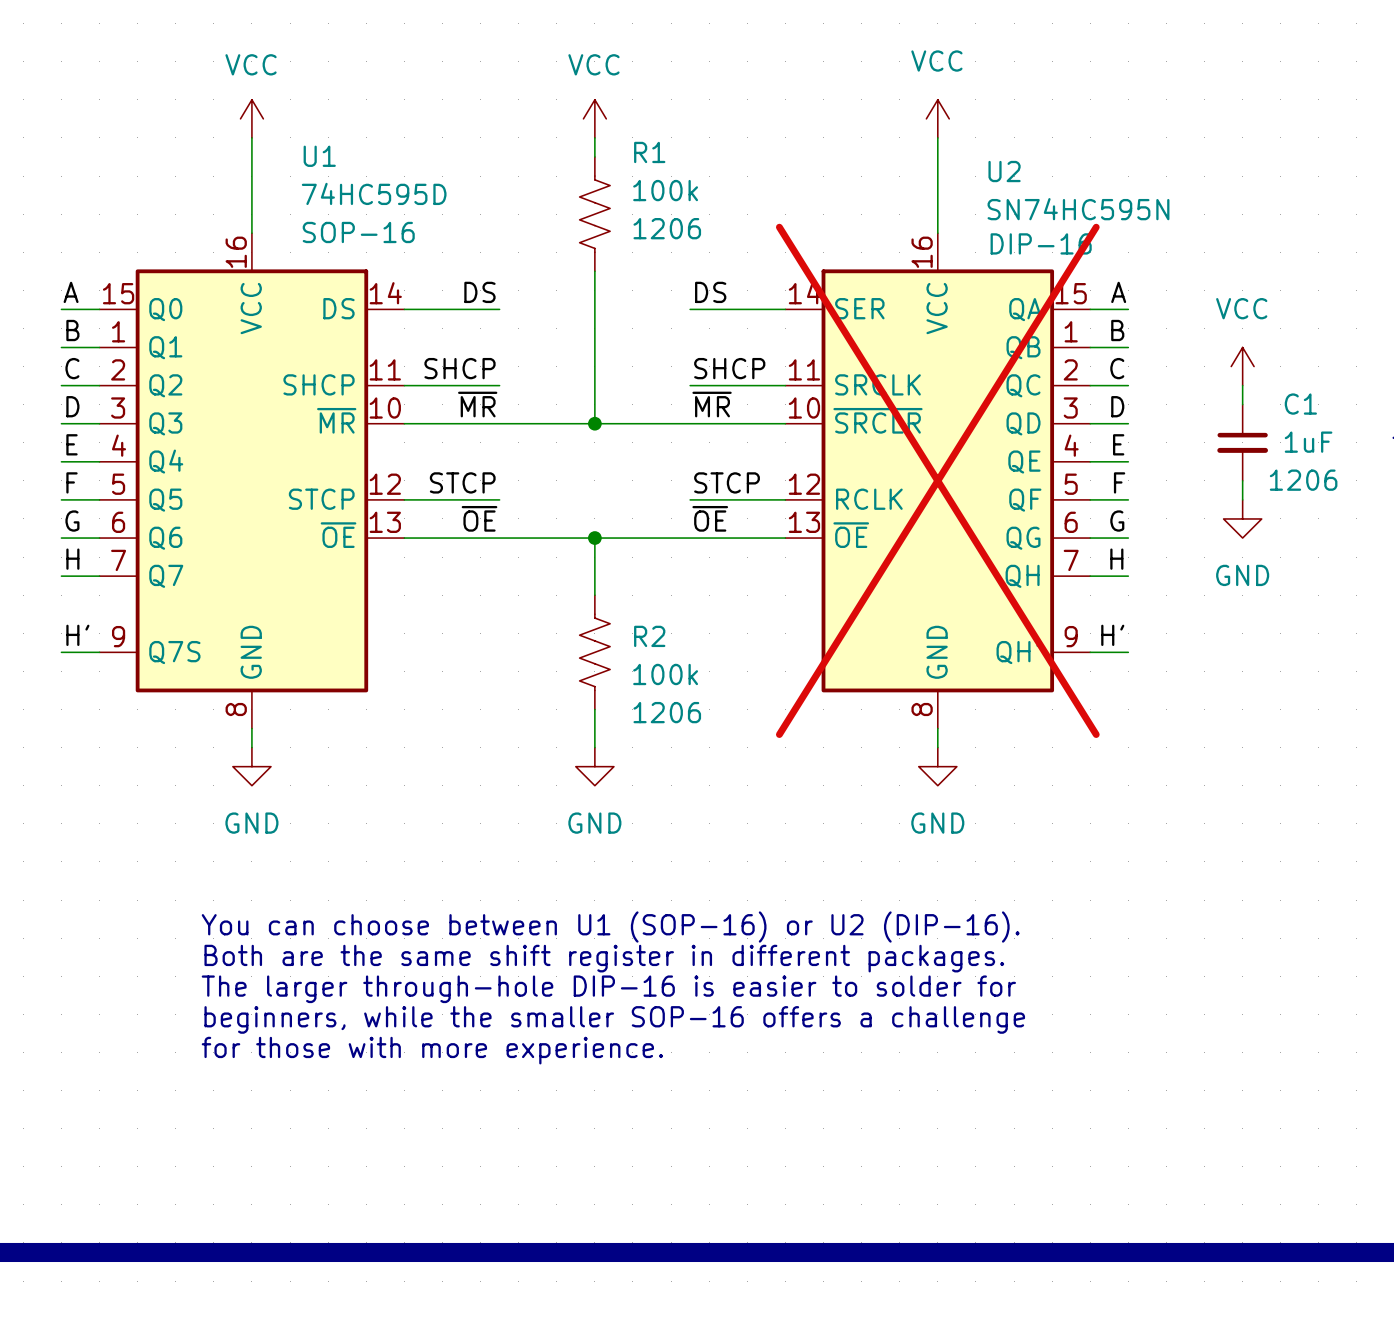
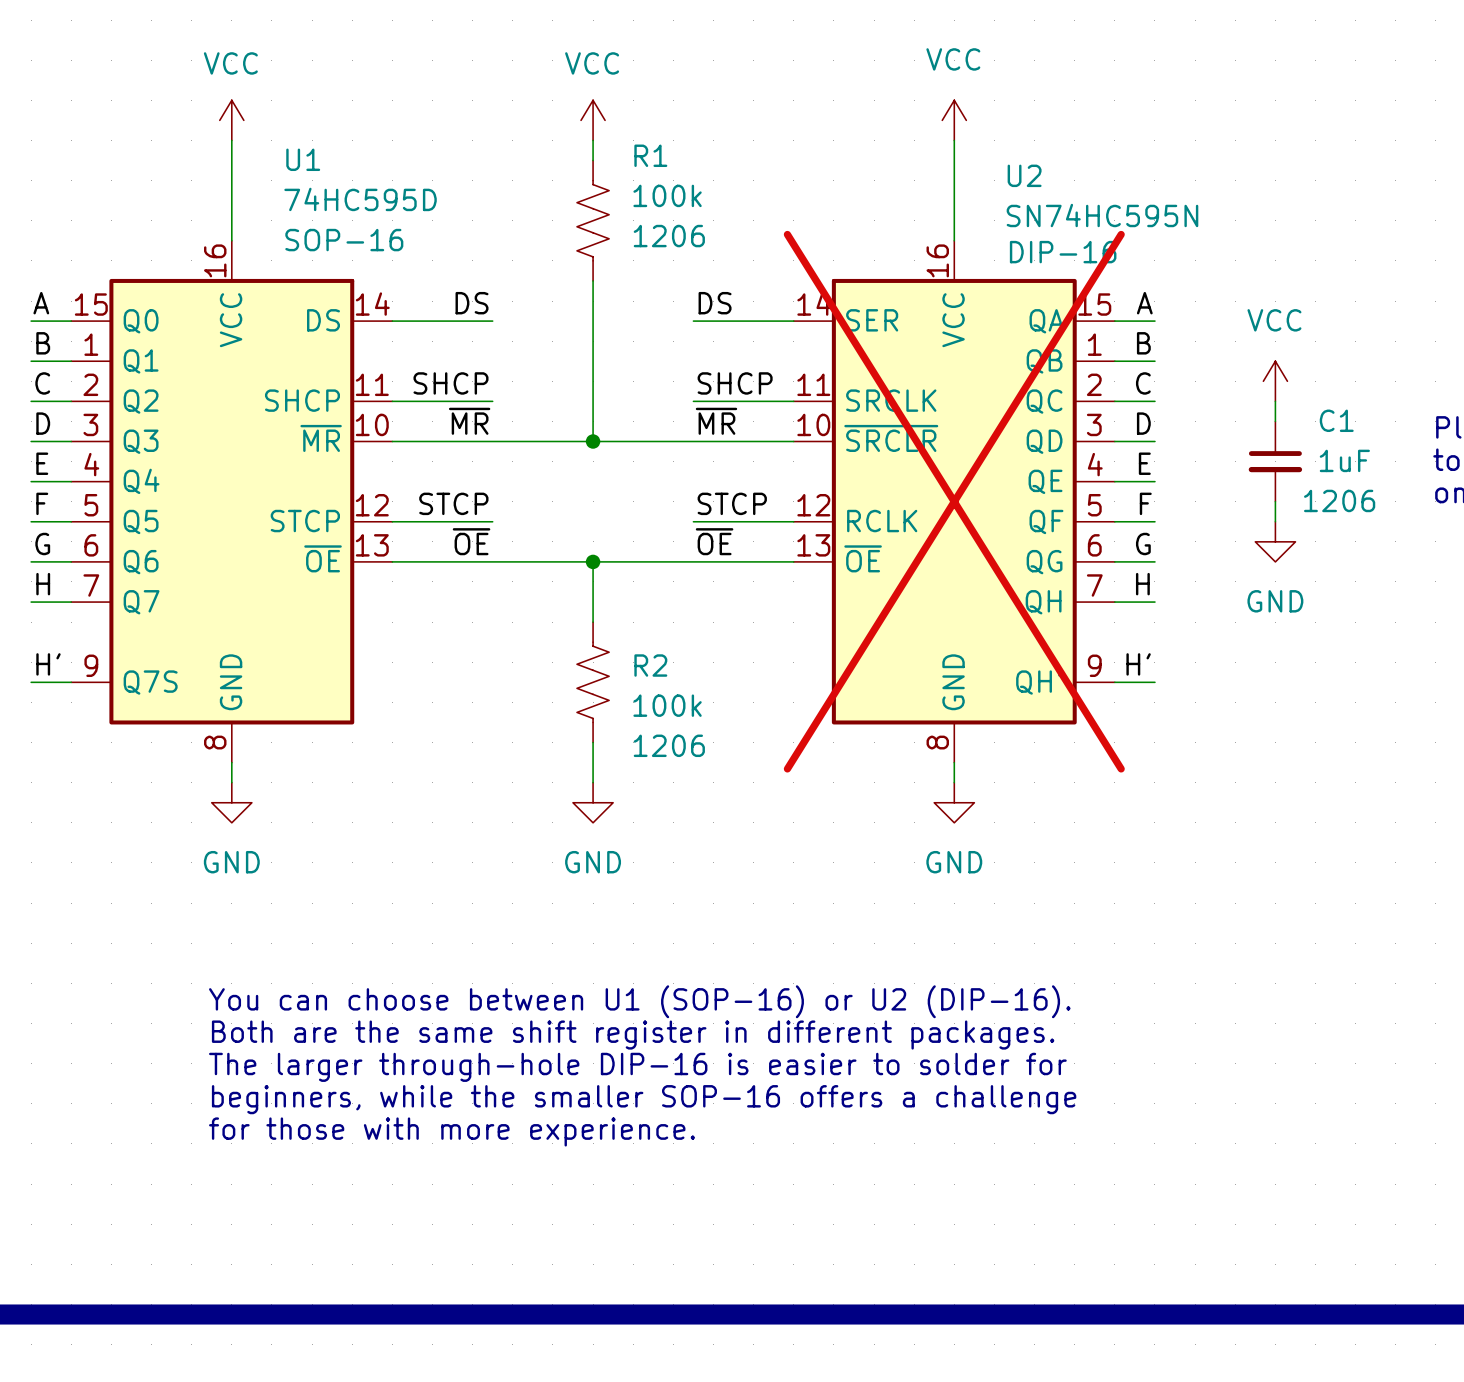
text position: You can choose between U1 (SOP-16) or U2 (DIP-16). (610, 927) -> You can choose between U1 (SOP-16) or U2 (DIP-16). (639, 1001)
text position: Both are the same shift register in different packages. (604, 958) -> Both are the same shift register in different packages. (633, 1035)
text position: The larger through-hole DIP-16 is easier to solder for (608, 989) -> The larger through-hole DIP-16 is easier to solder for (637, 1067)
text position: beginners, while the smaller SOP-16 offers a challenge (614, 1019) -> beginners, while the smaller SOP-16 offers a challenge (644, 1099)
text position: for those with more experience. (432, 1050) -> for those with more experience. (452, 1131)

